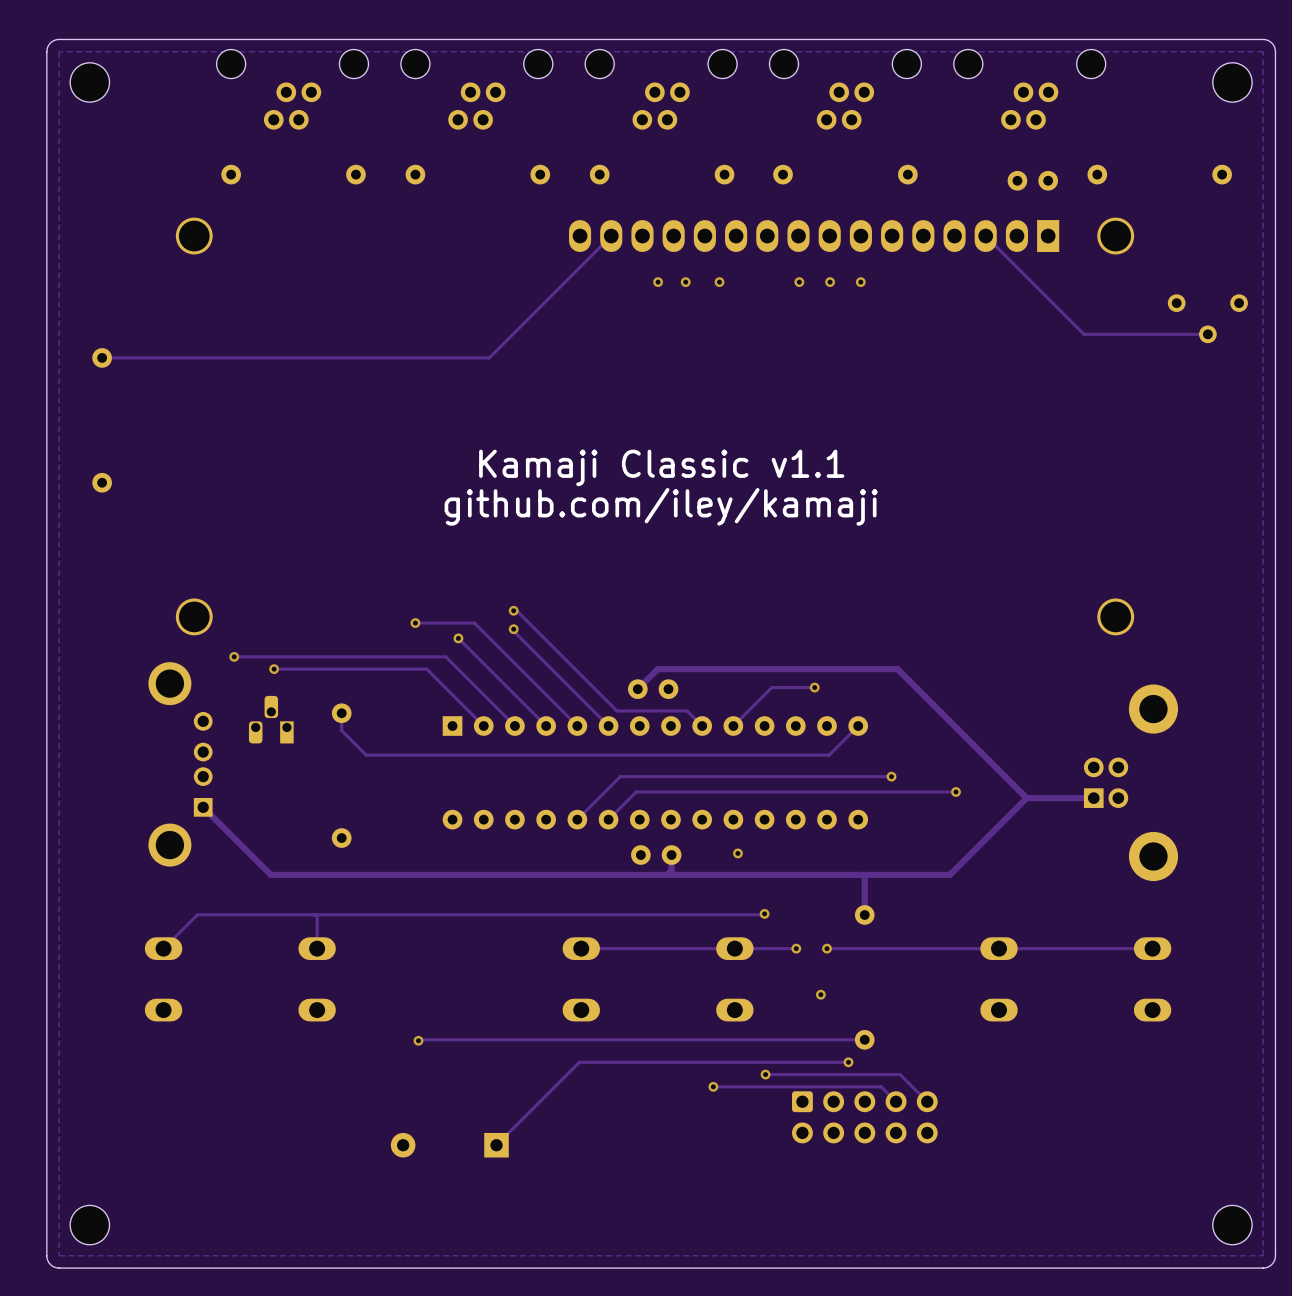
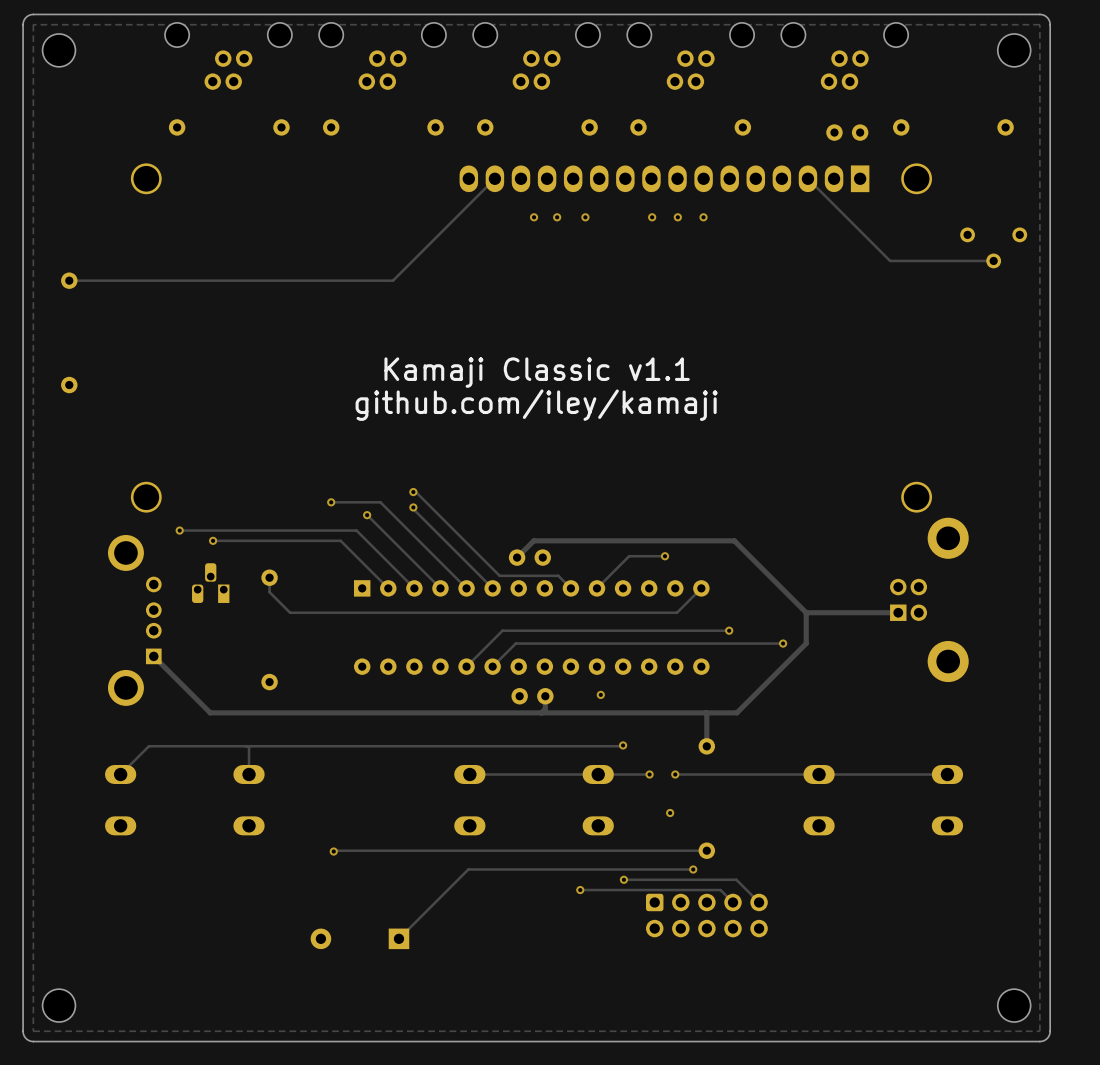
track: (983, 755) (1026, 798) -> none
part position: (1131, 782) -> (929, 599)
track: (1026, 798) (949, 874) (900, 874) -> (898, 612) (806, 612) (806, 643) (736, 712)
track: (1093, 798) (1026, 798) -> none

